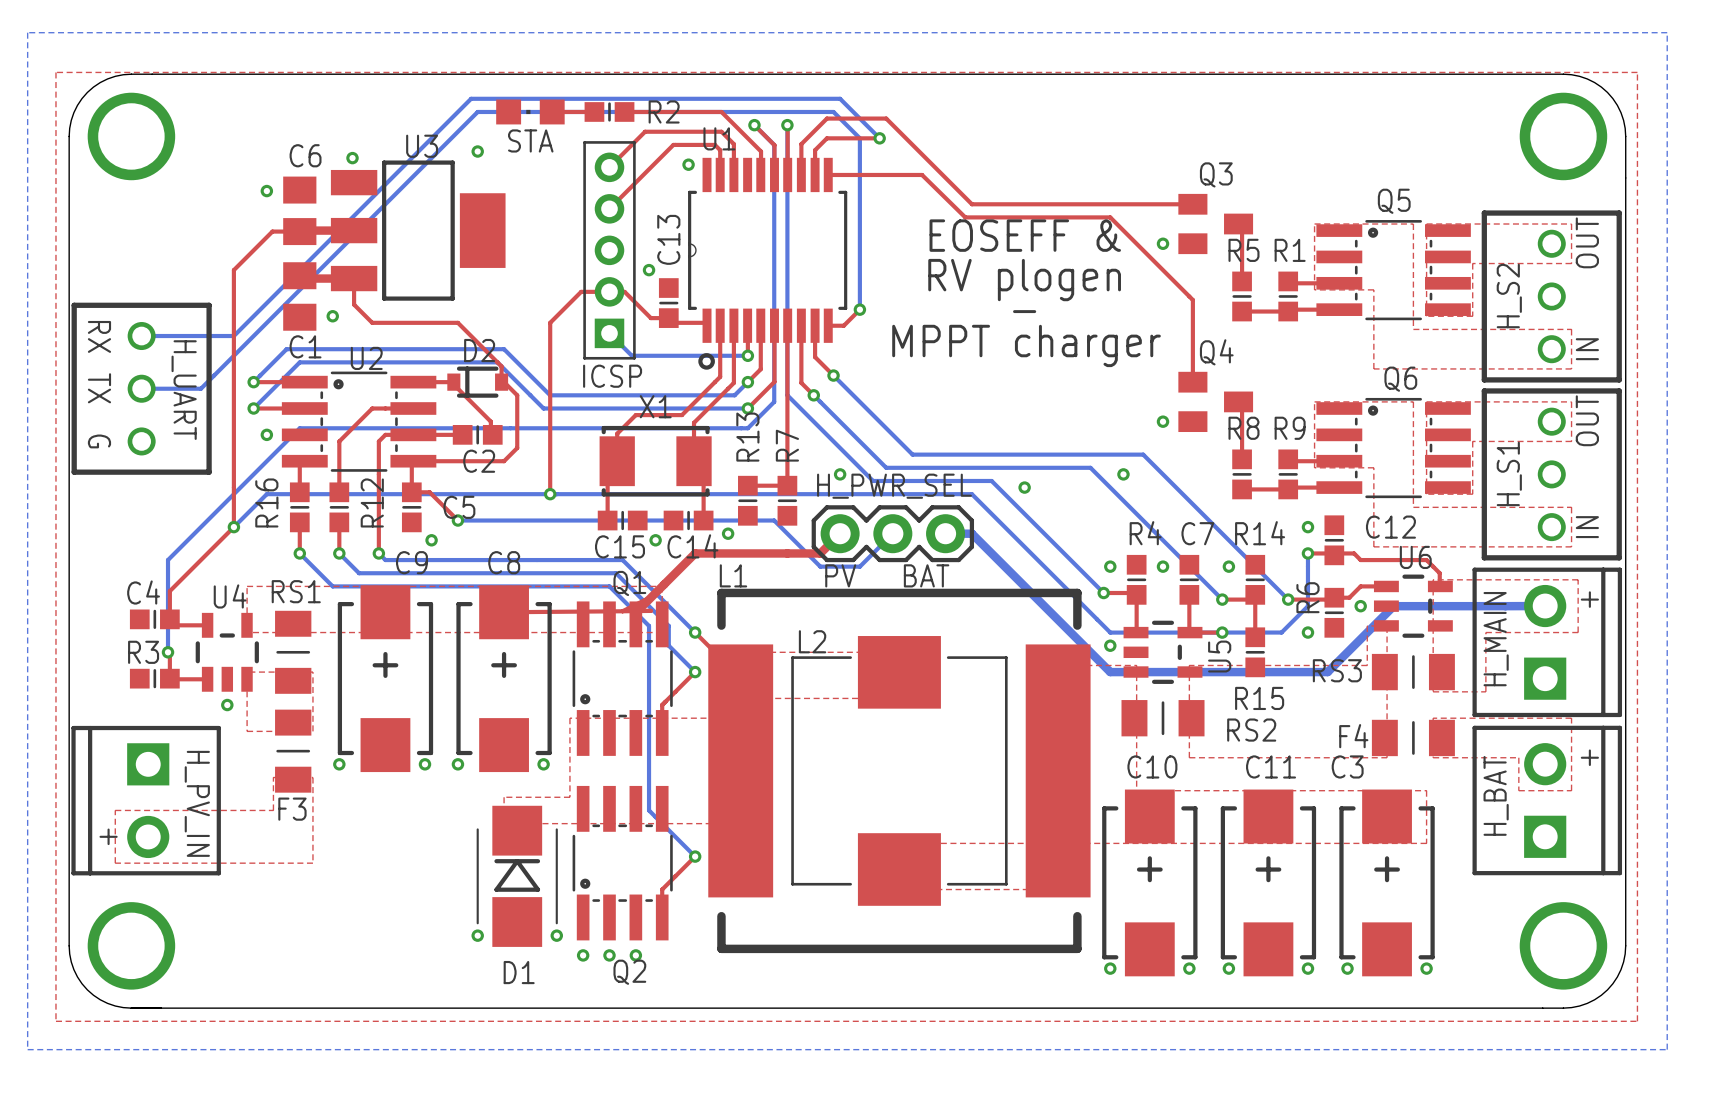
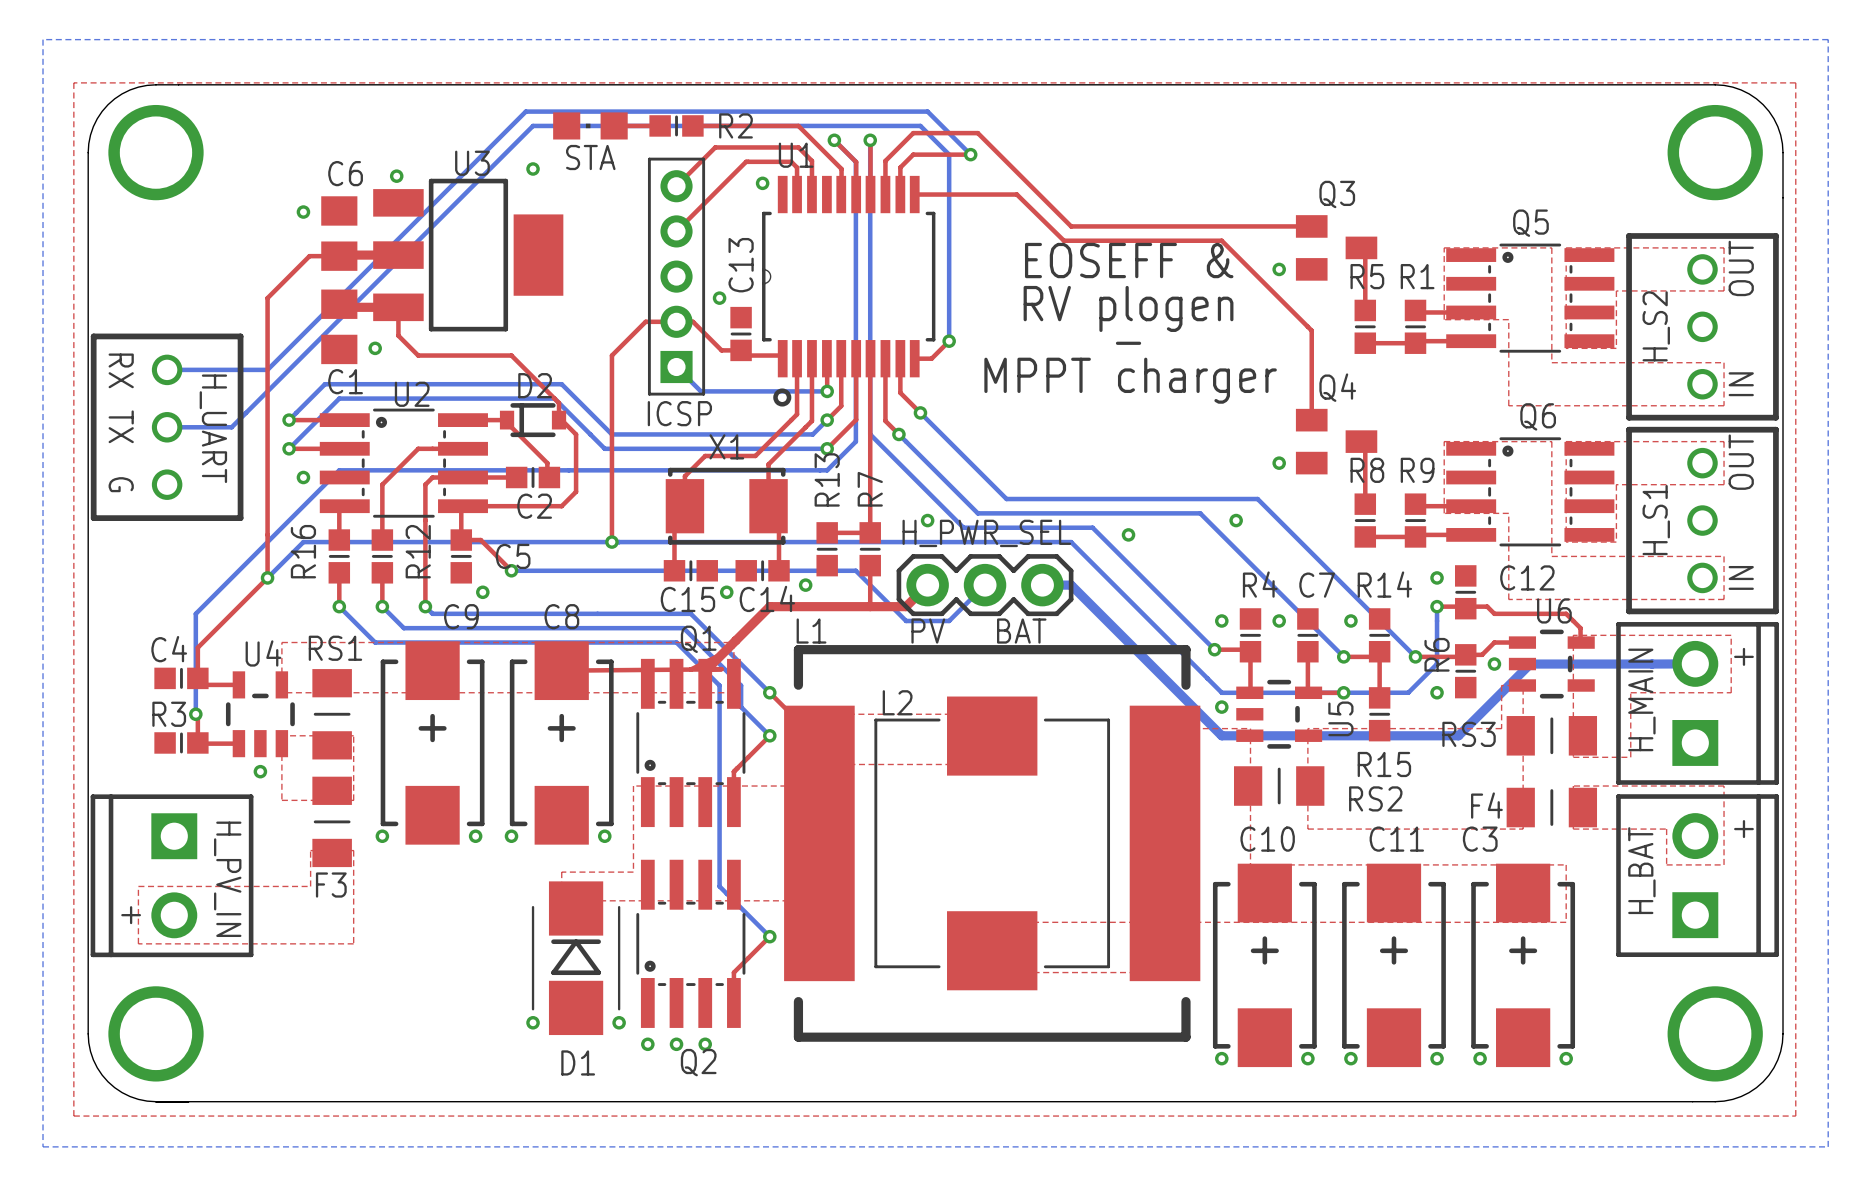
top track: none -> (870, 565) (870, 606)

